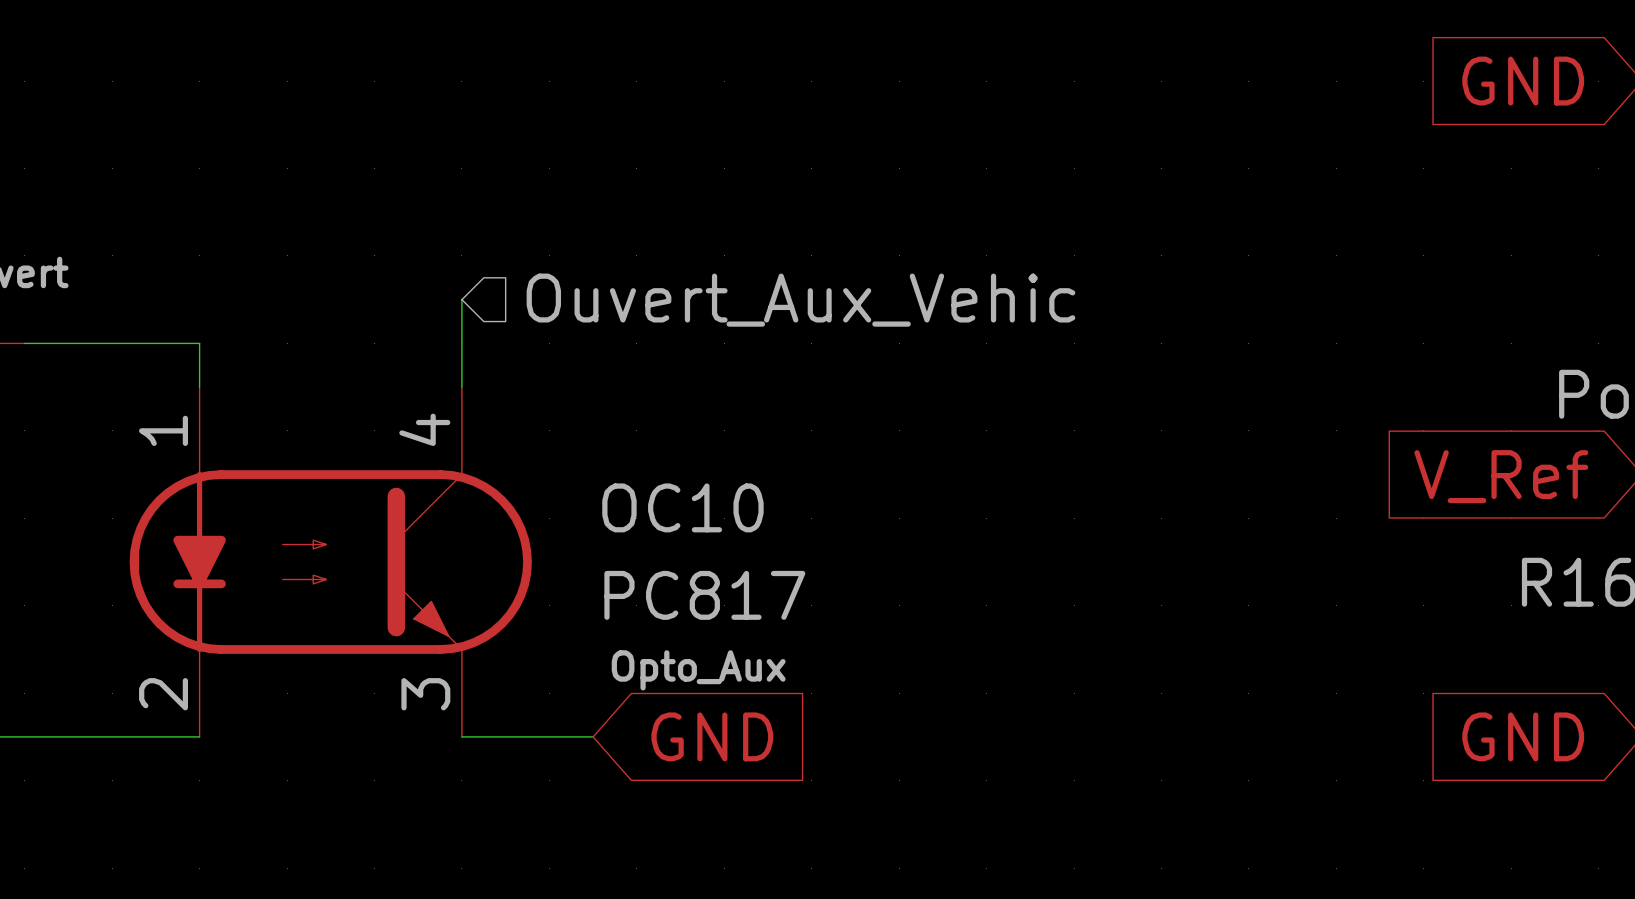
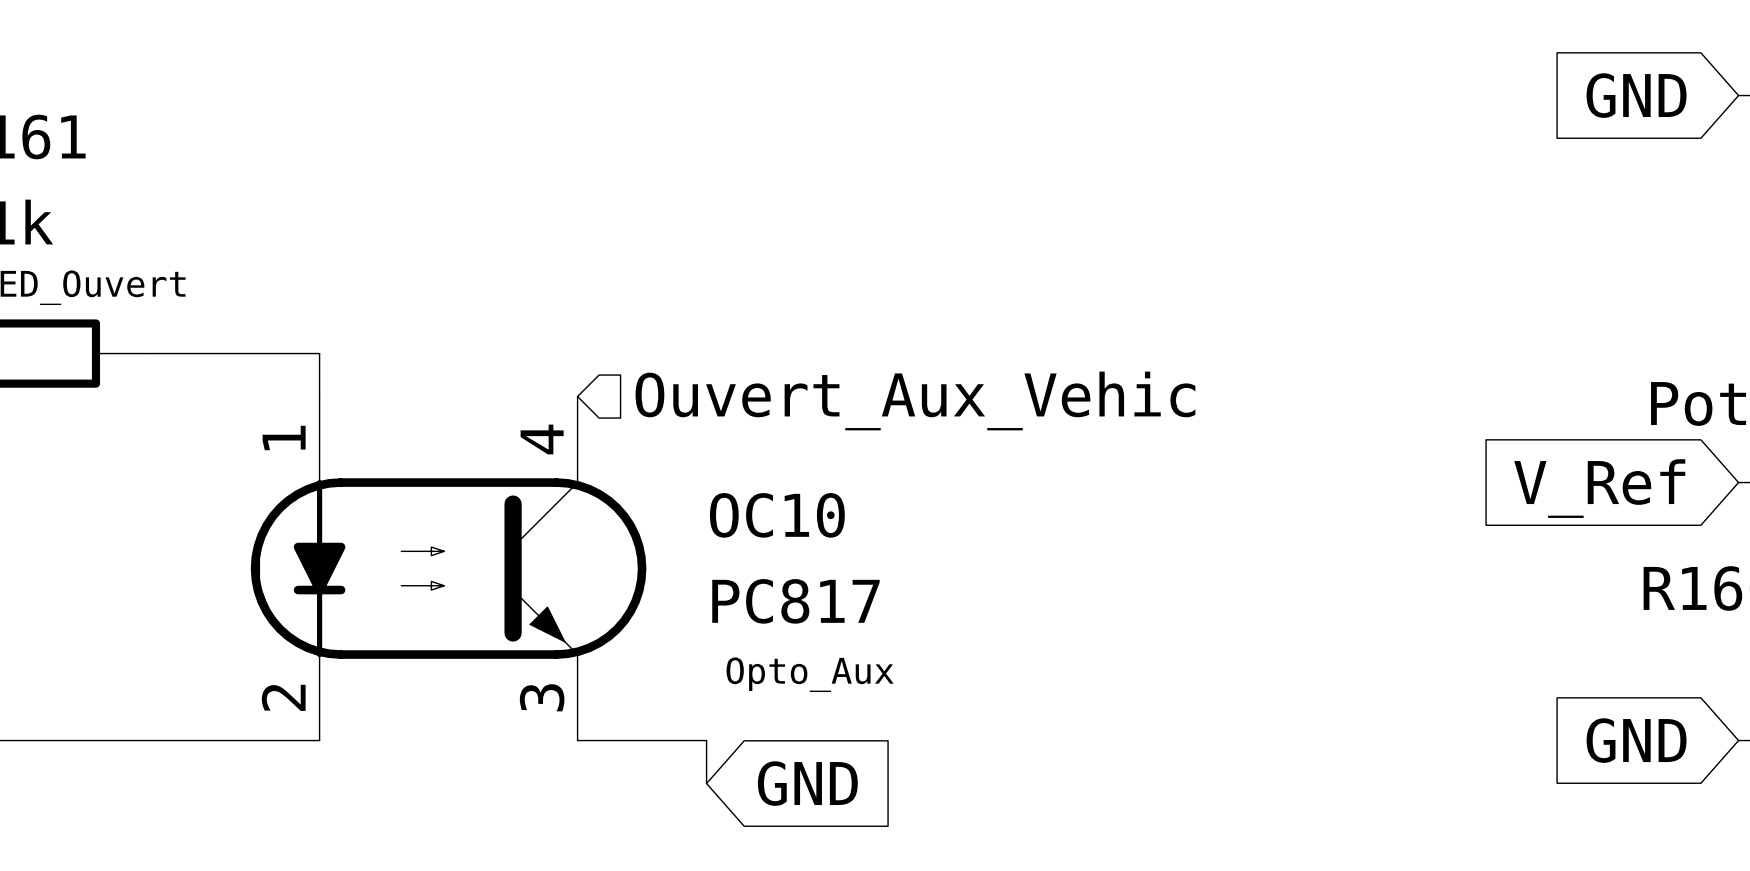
wire: (461, 299) (461, 387) -> none
hierarchical label position: Ouvert_Aux_Vehic (800, 300) -> Ouvert_Aux_Vehic (915, 400)
wire: none -> (706, 740) (706, 783)
global label position: GND (712, 736) -> GND (807, 783)

